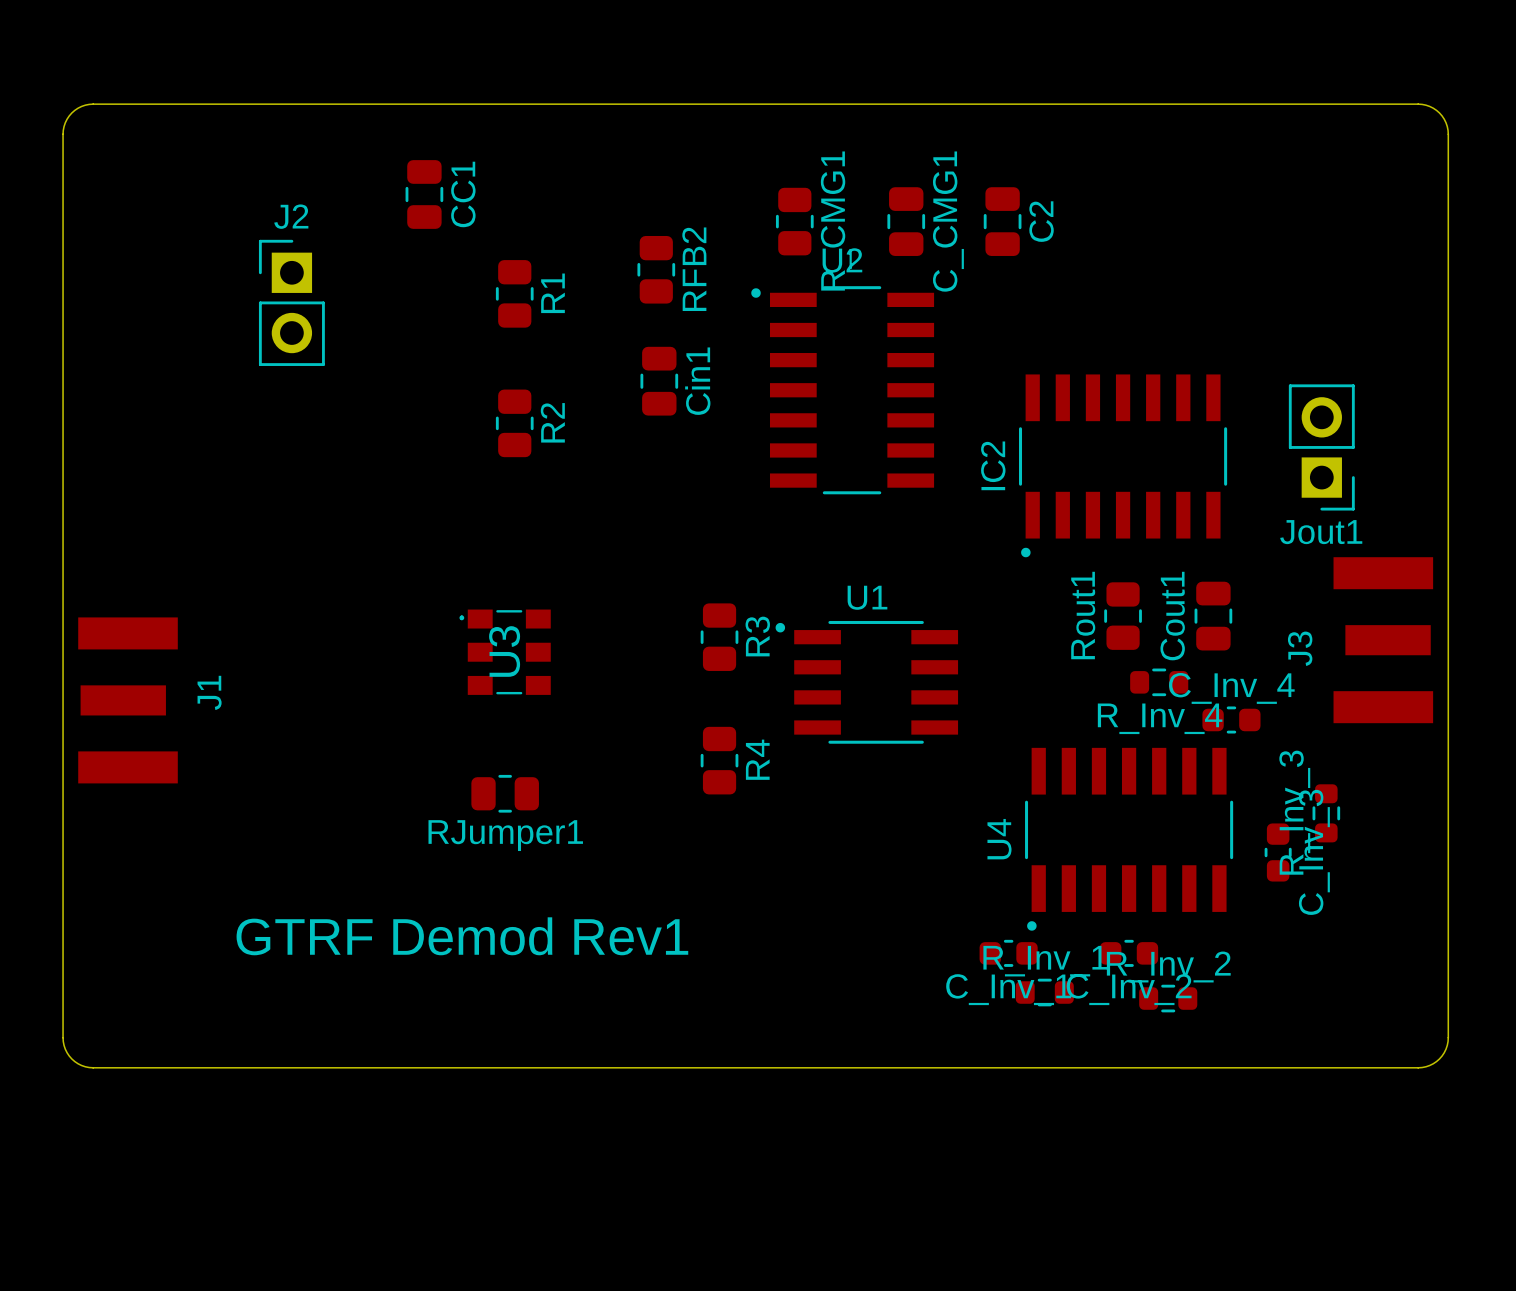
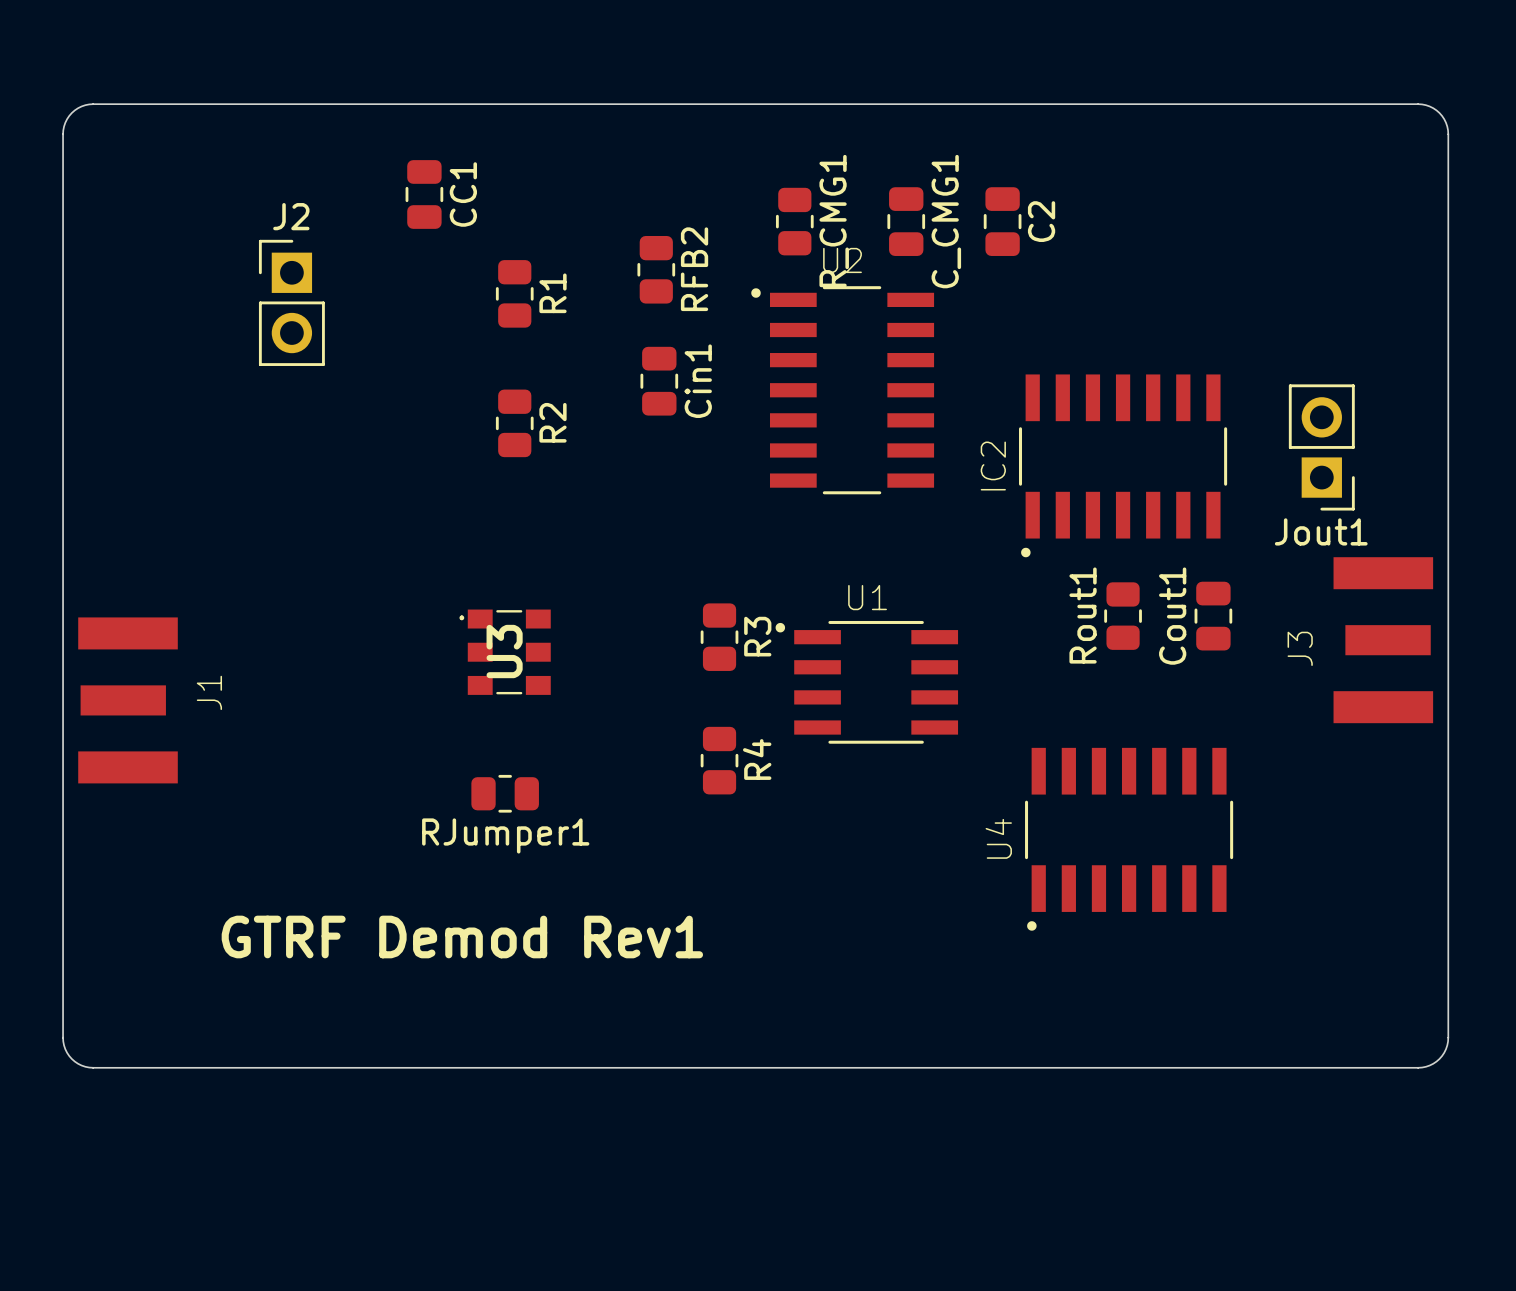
R_Inv_4: (1159, 682) -> none
C_Inv_4: (1231, 719) -> none
R_Inv_3: (1326, 813) -> none
C_Inv_3: (1278, 852) -> none
C_Inv_1: (1008, 953) -> none
C_Inv_2: (1129, 953) -> none
R_Inv_1: (1044, 992) -> none
R_Inv_2: (1168, 998) -> none

